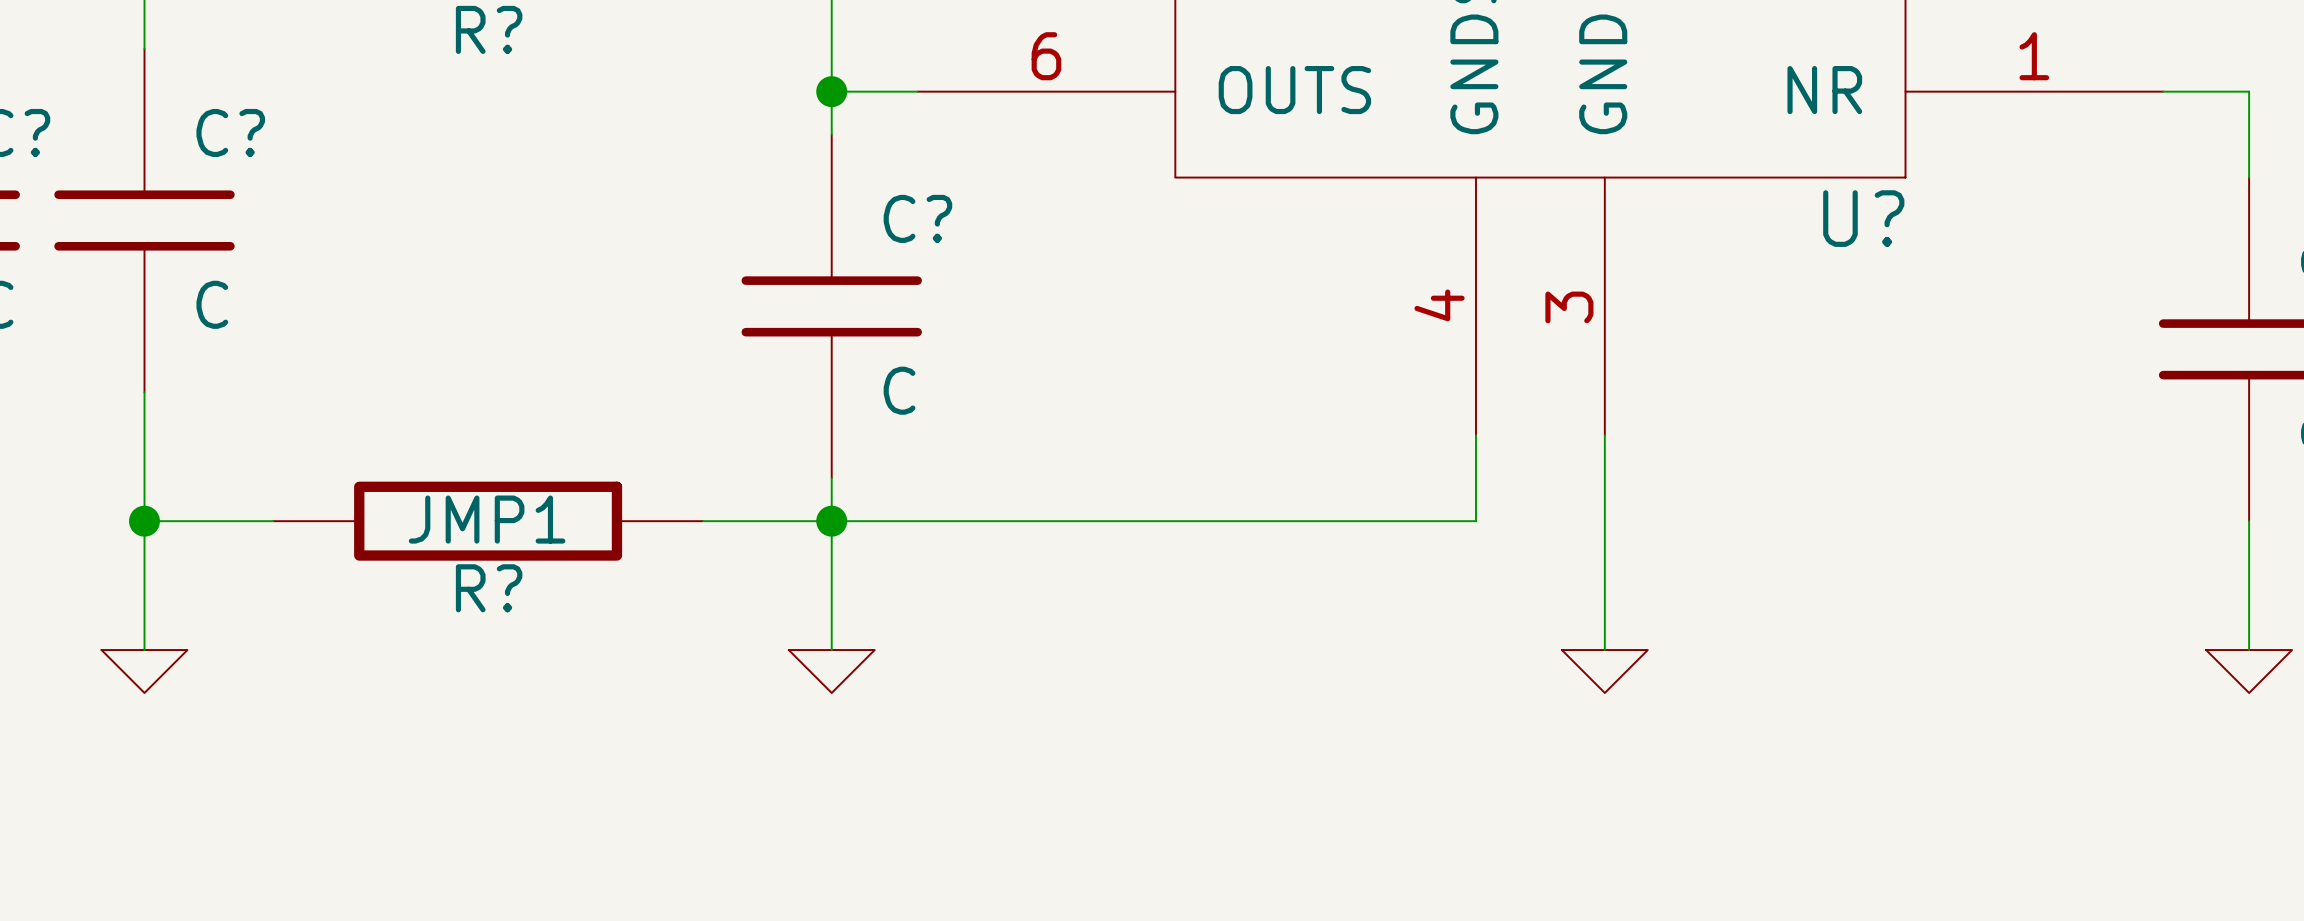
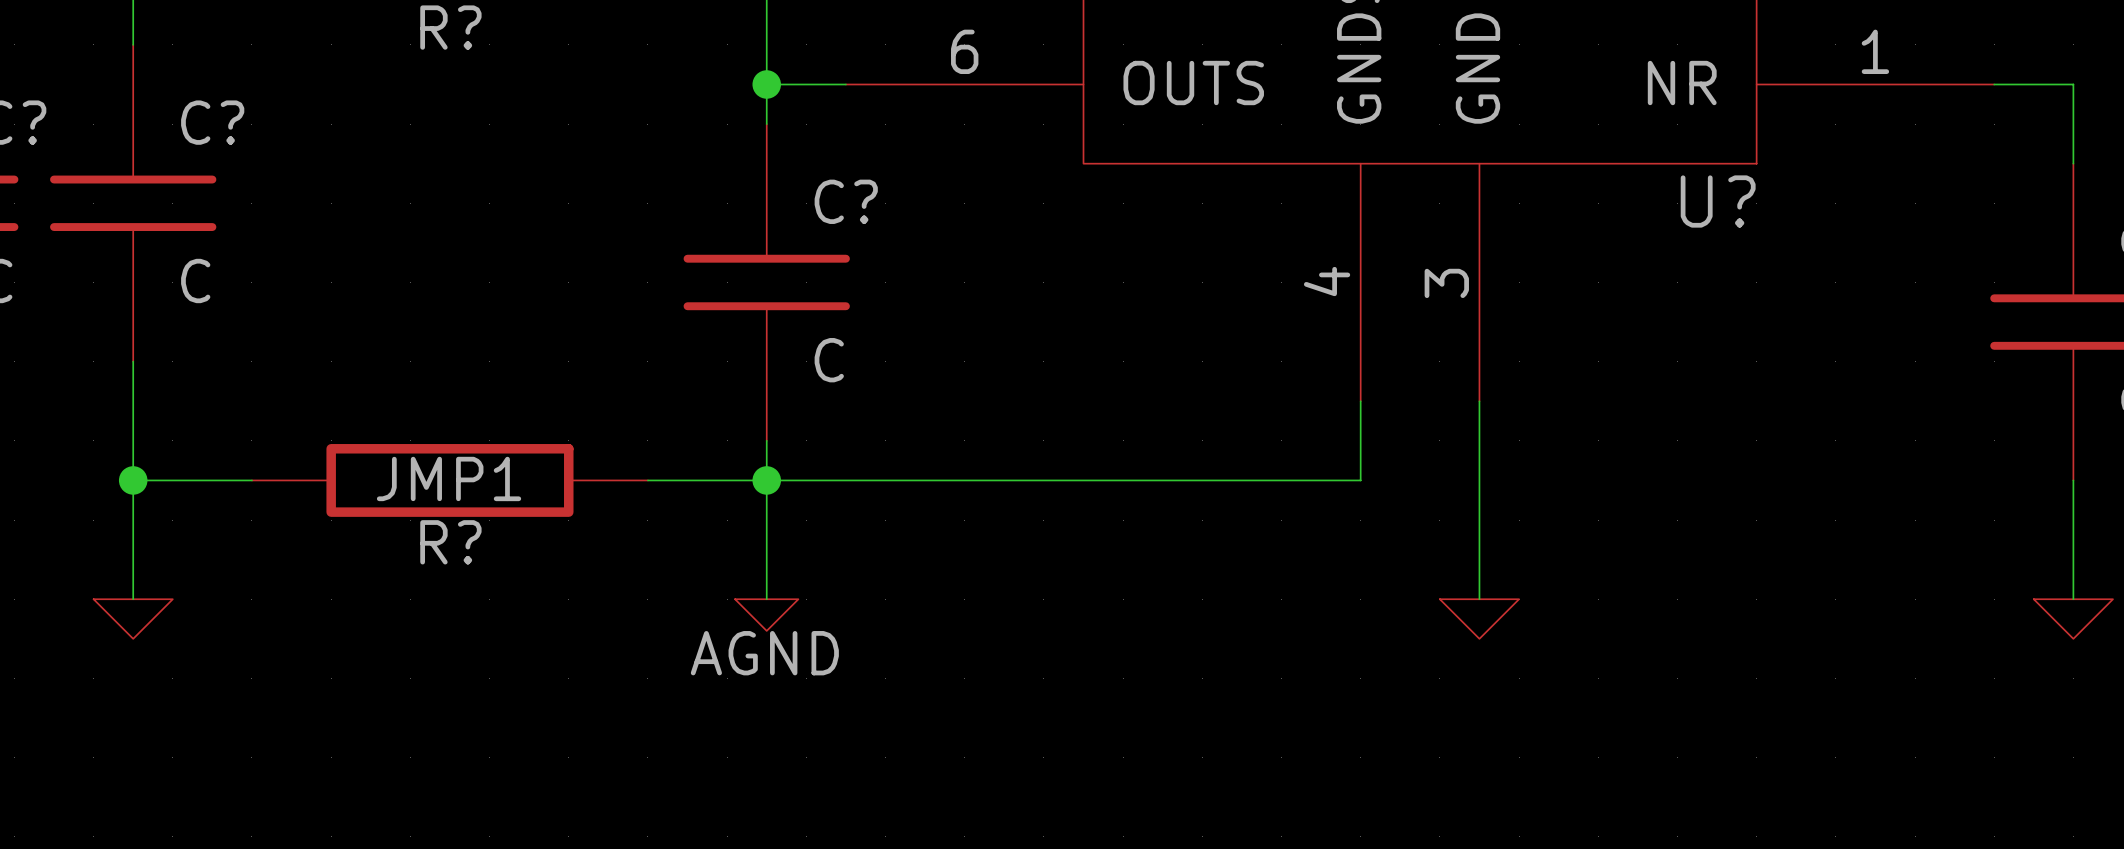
power symbol shape: [788, 650, 875, 693] -> [735, 599, 799, 631]
power symbol text: none -> AGND (764, 653)

